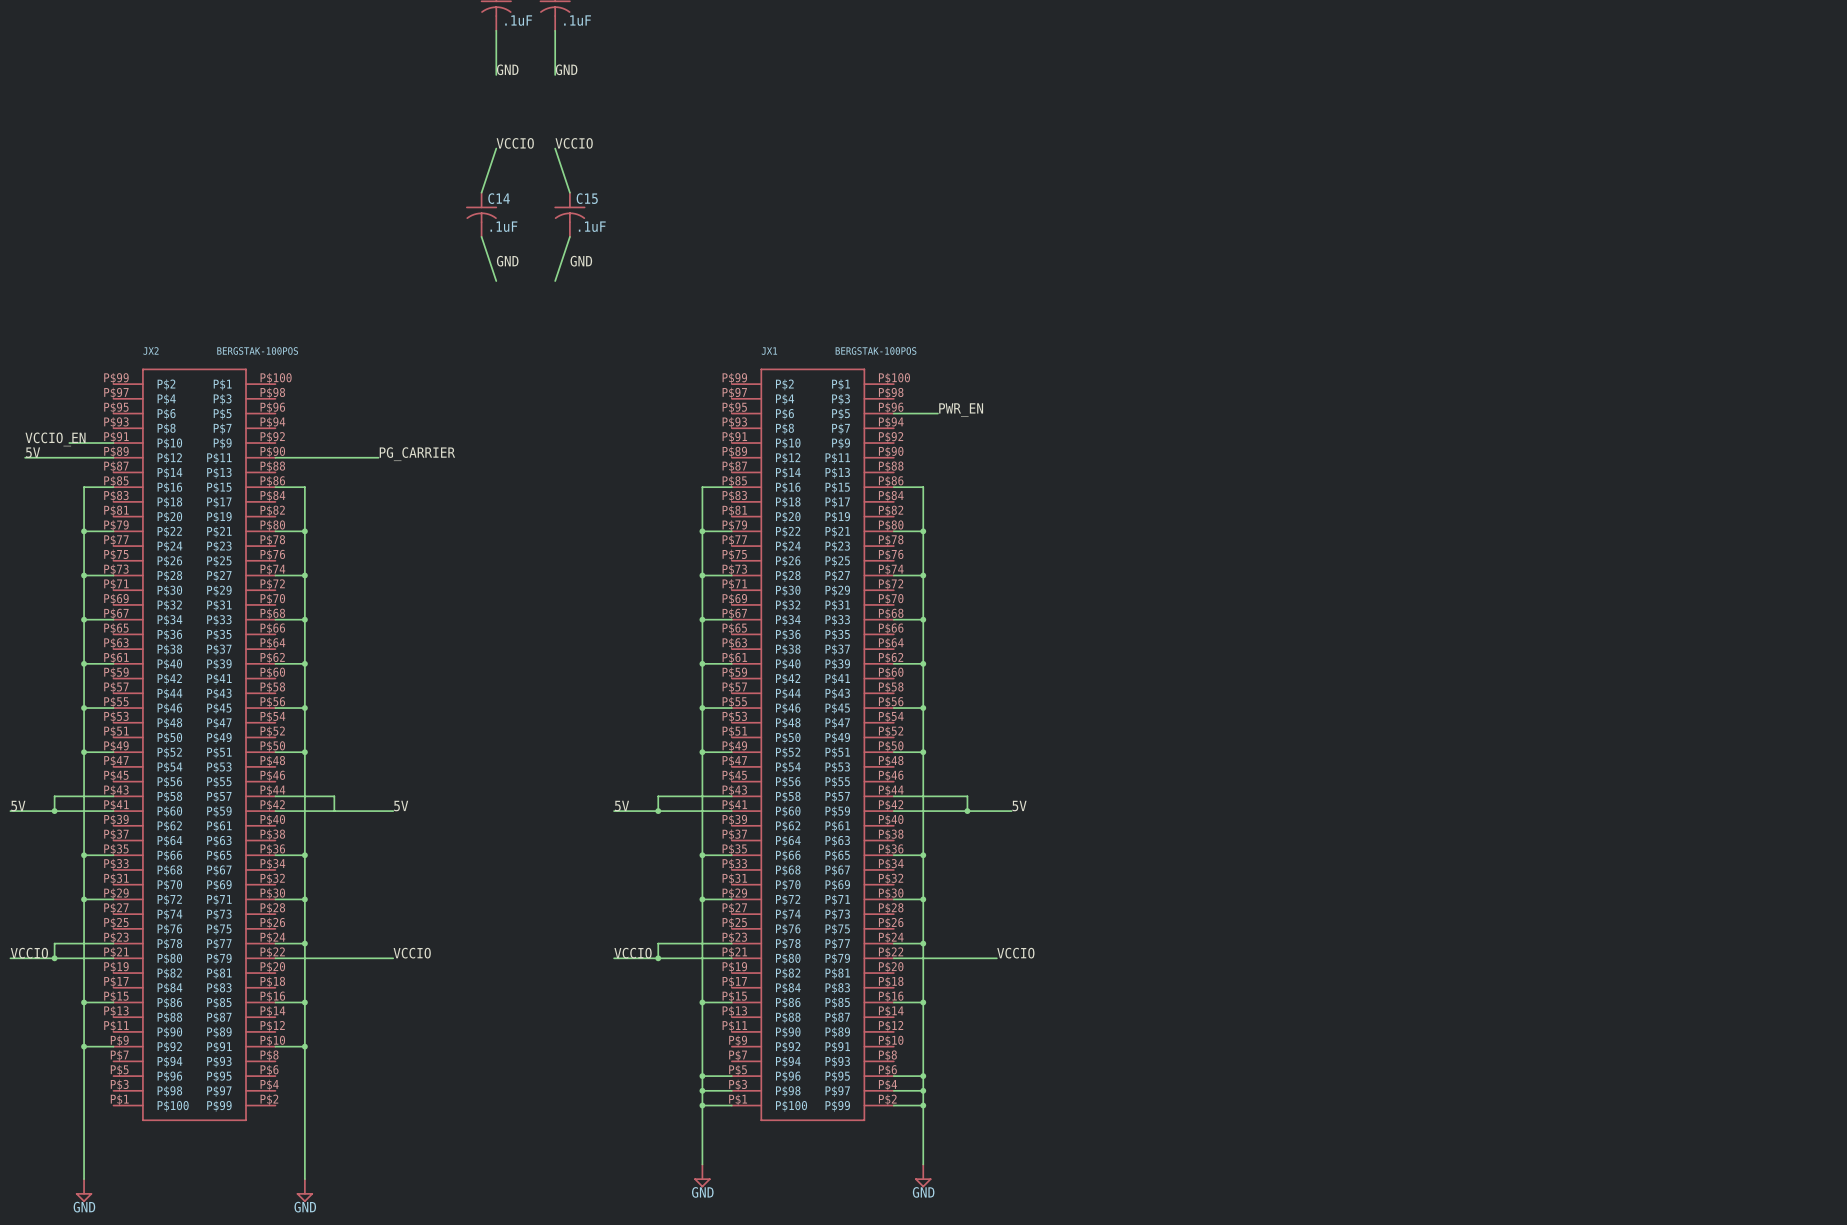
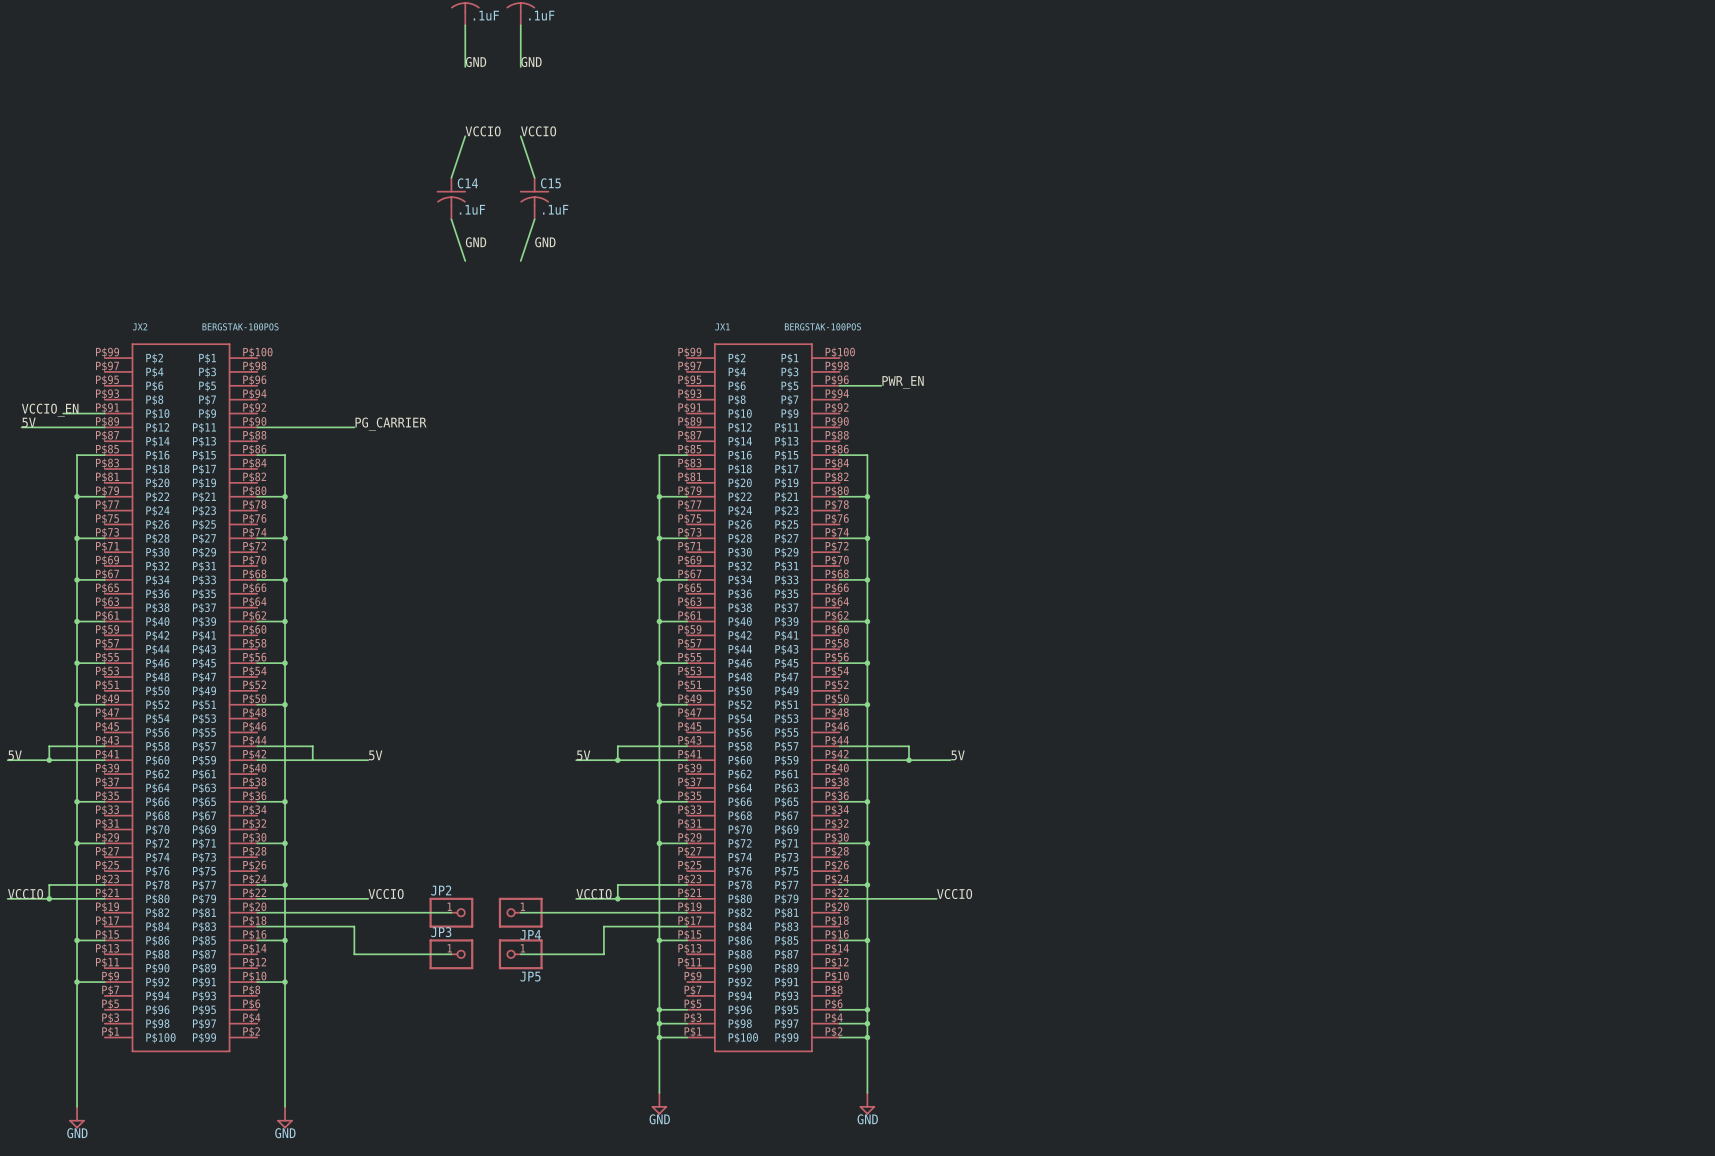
wire: none -> (257, 912) (451, 912)
JP2: none -> (451, 912)
wire: none -> (520, 912) (687, 912)
JP4: none -> (520, 912)
wire: none -> (257, 926) (354, 926) (354, 954) (451, 954)
wire: none -> (687, 926) (603, 926) (603, 954) (520, 954)
JP3: none -> (451, 954)
JP5: none -> (520, 954)

